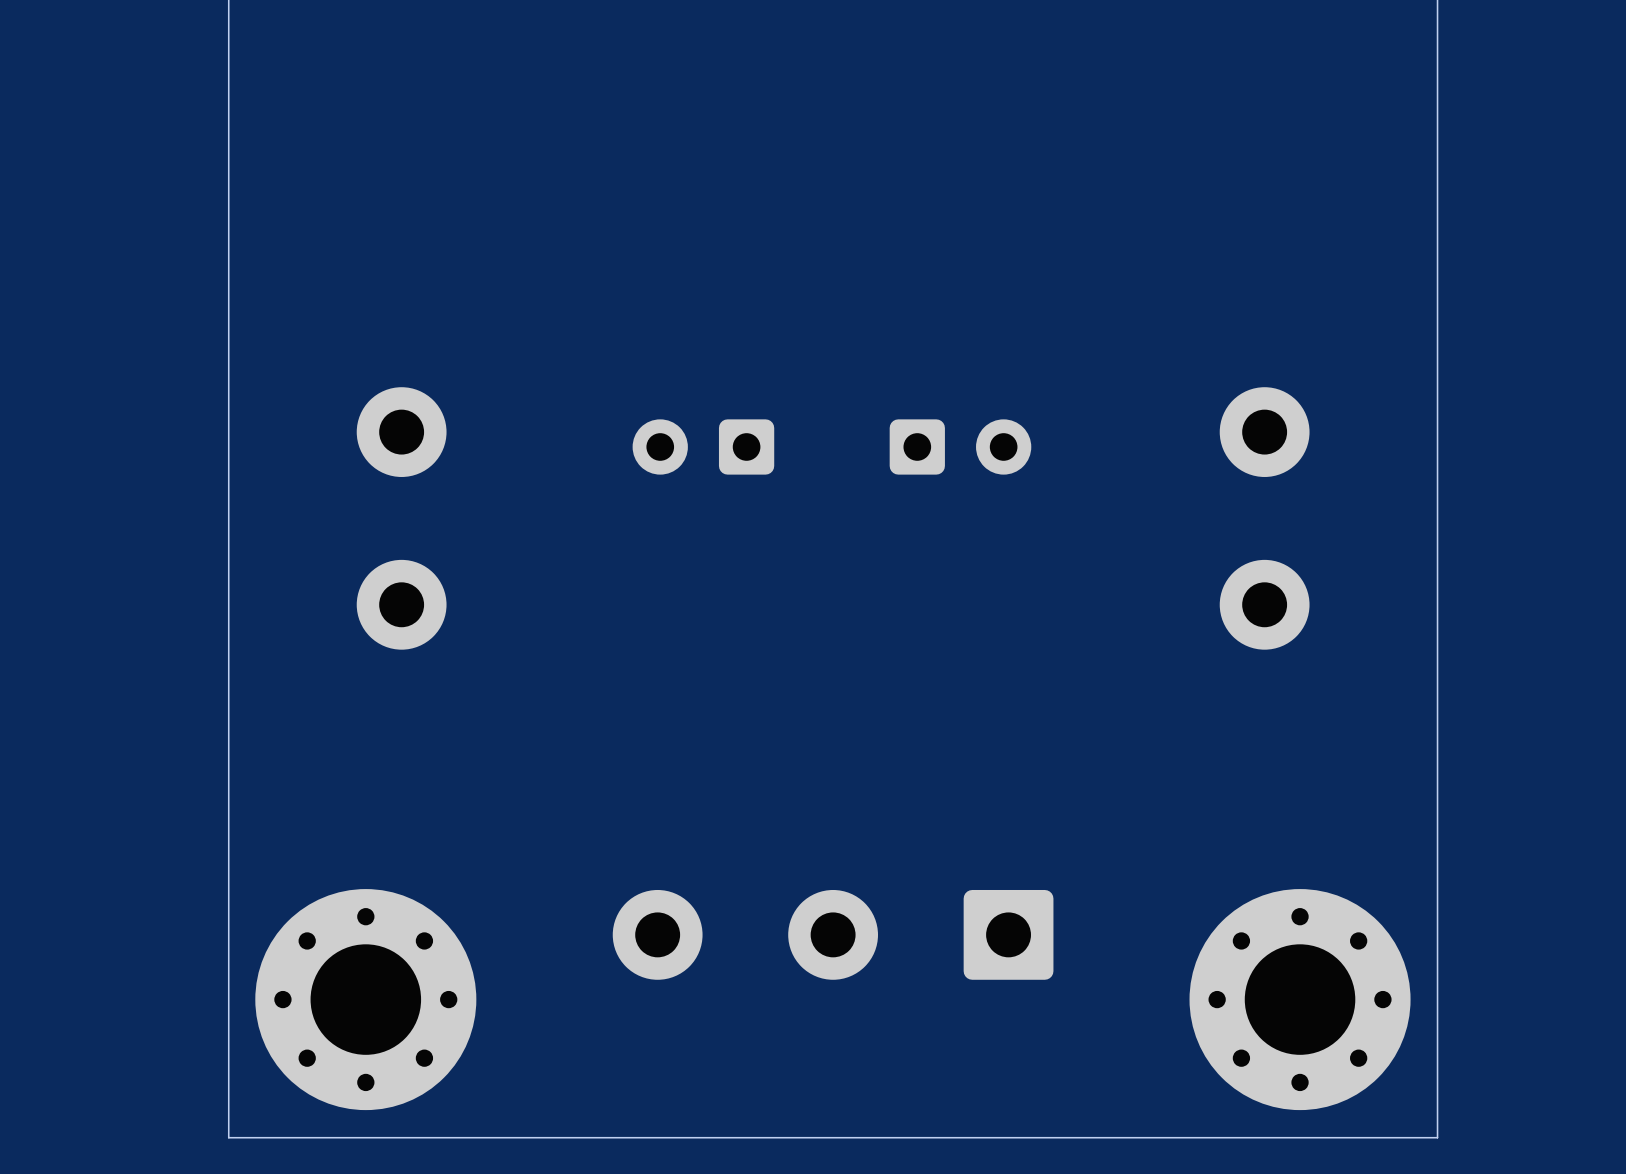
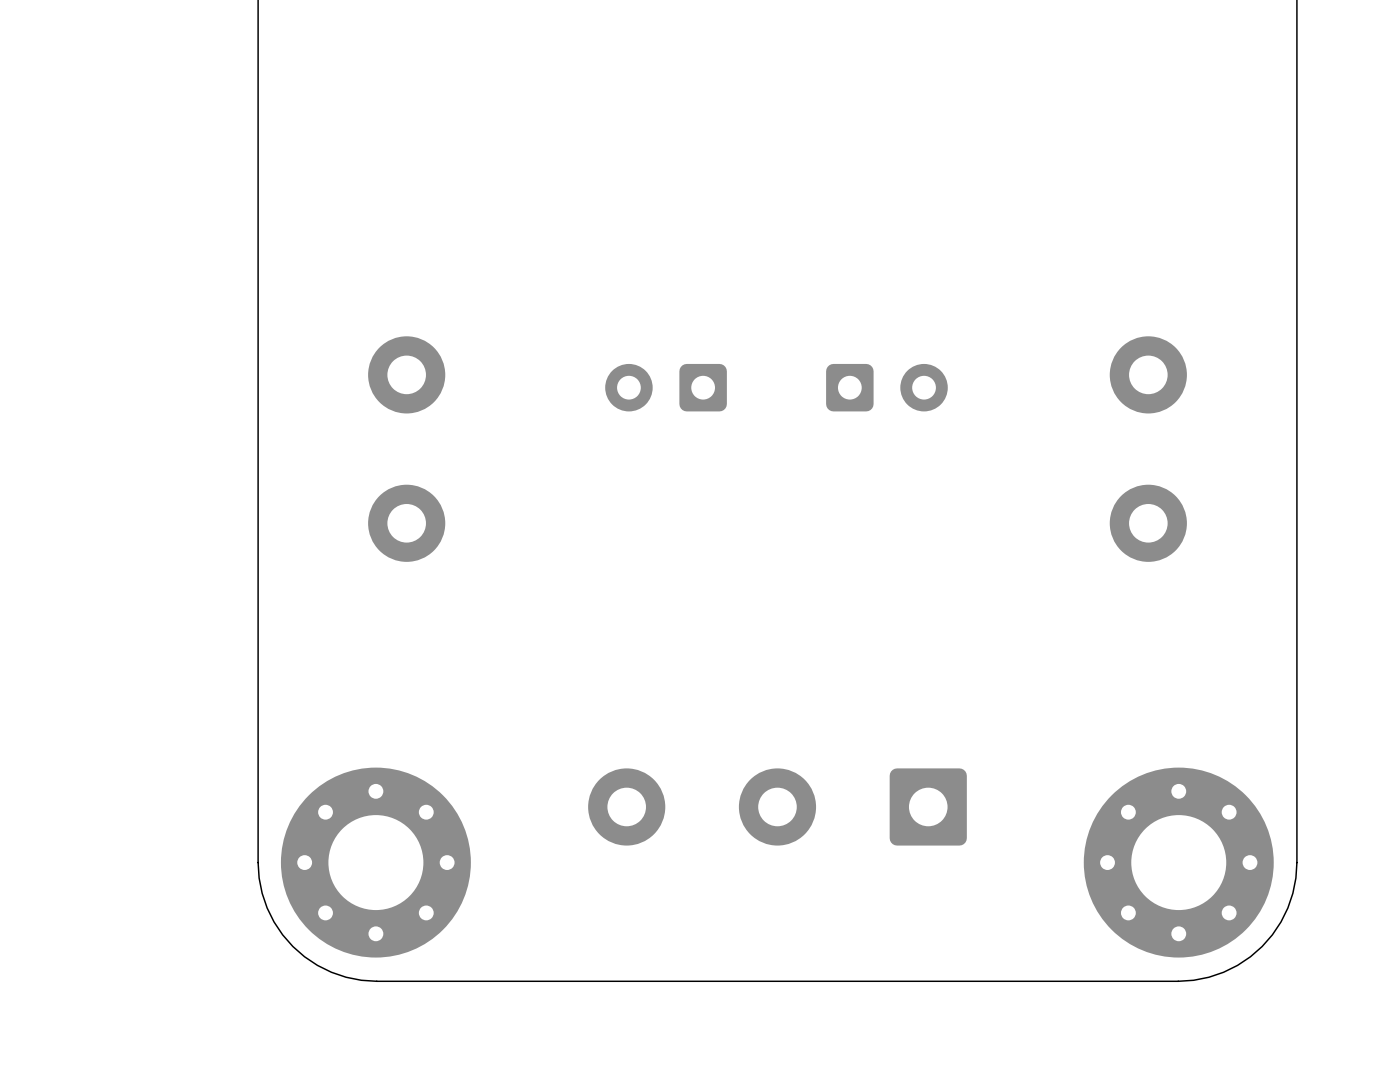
board edge: (228, 999) (228, 1137) (366, 1137) -> (258, 862) (262, 893) (267, 908) (282, 934) (292, 946) (317, 965) (331, 972) (346, 977) (376, 981)
board edge: (1437, 999) (1437, 1137) (1299, 1137) -> (1296, 862) (1292, 893) (1287, 908) (1281, 921) (1262, 946) (1237, 965) (1223, 972) (1193, 980) (1178, 981)

